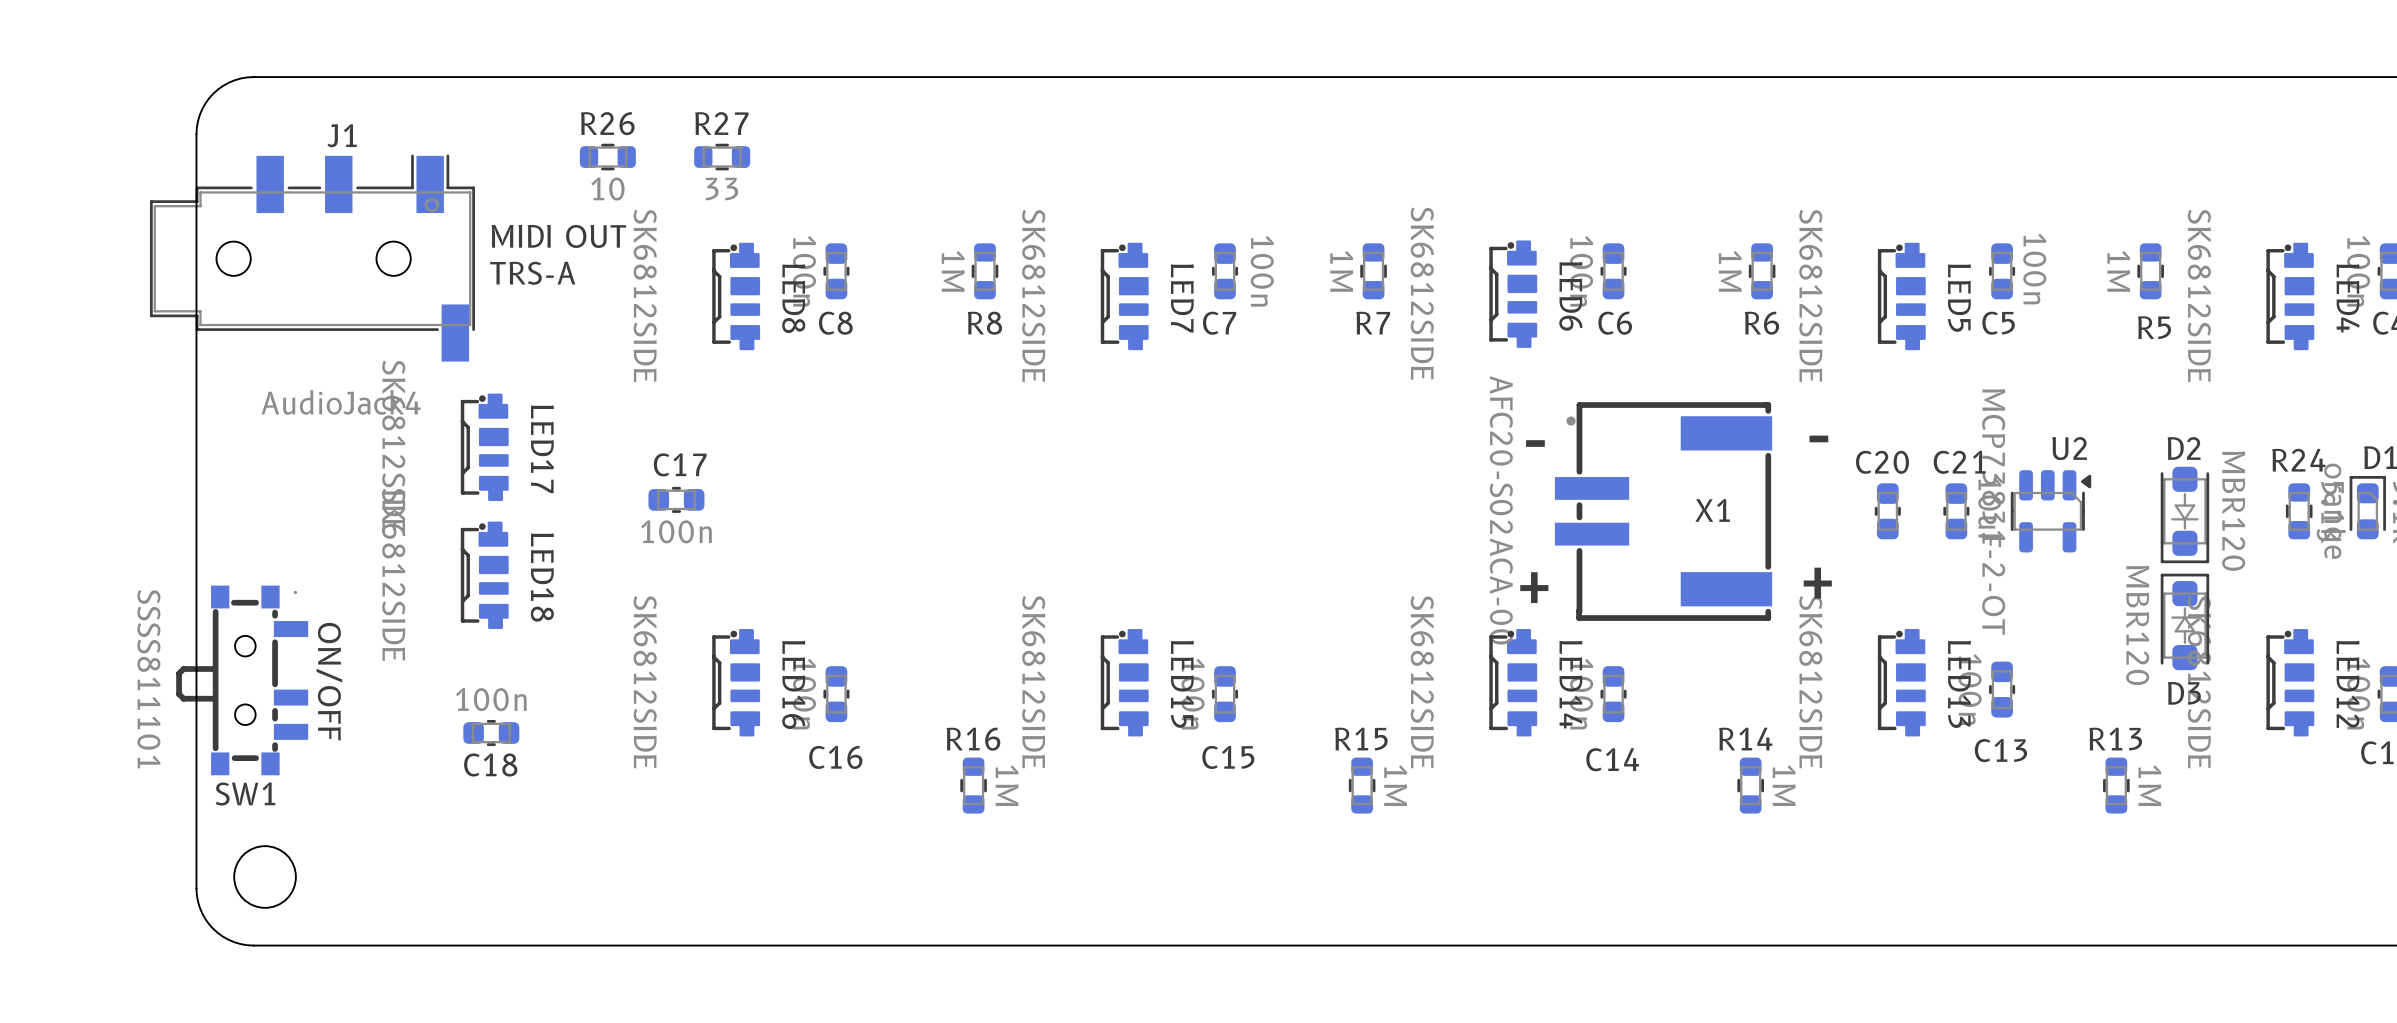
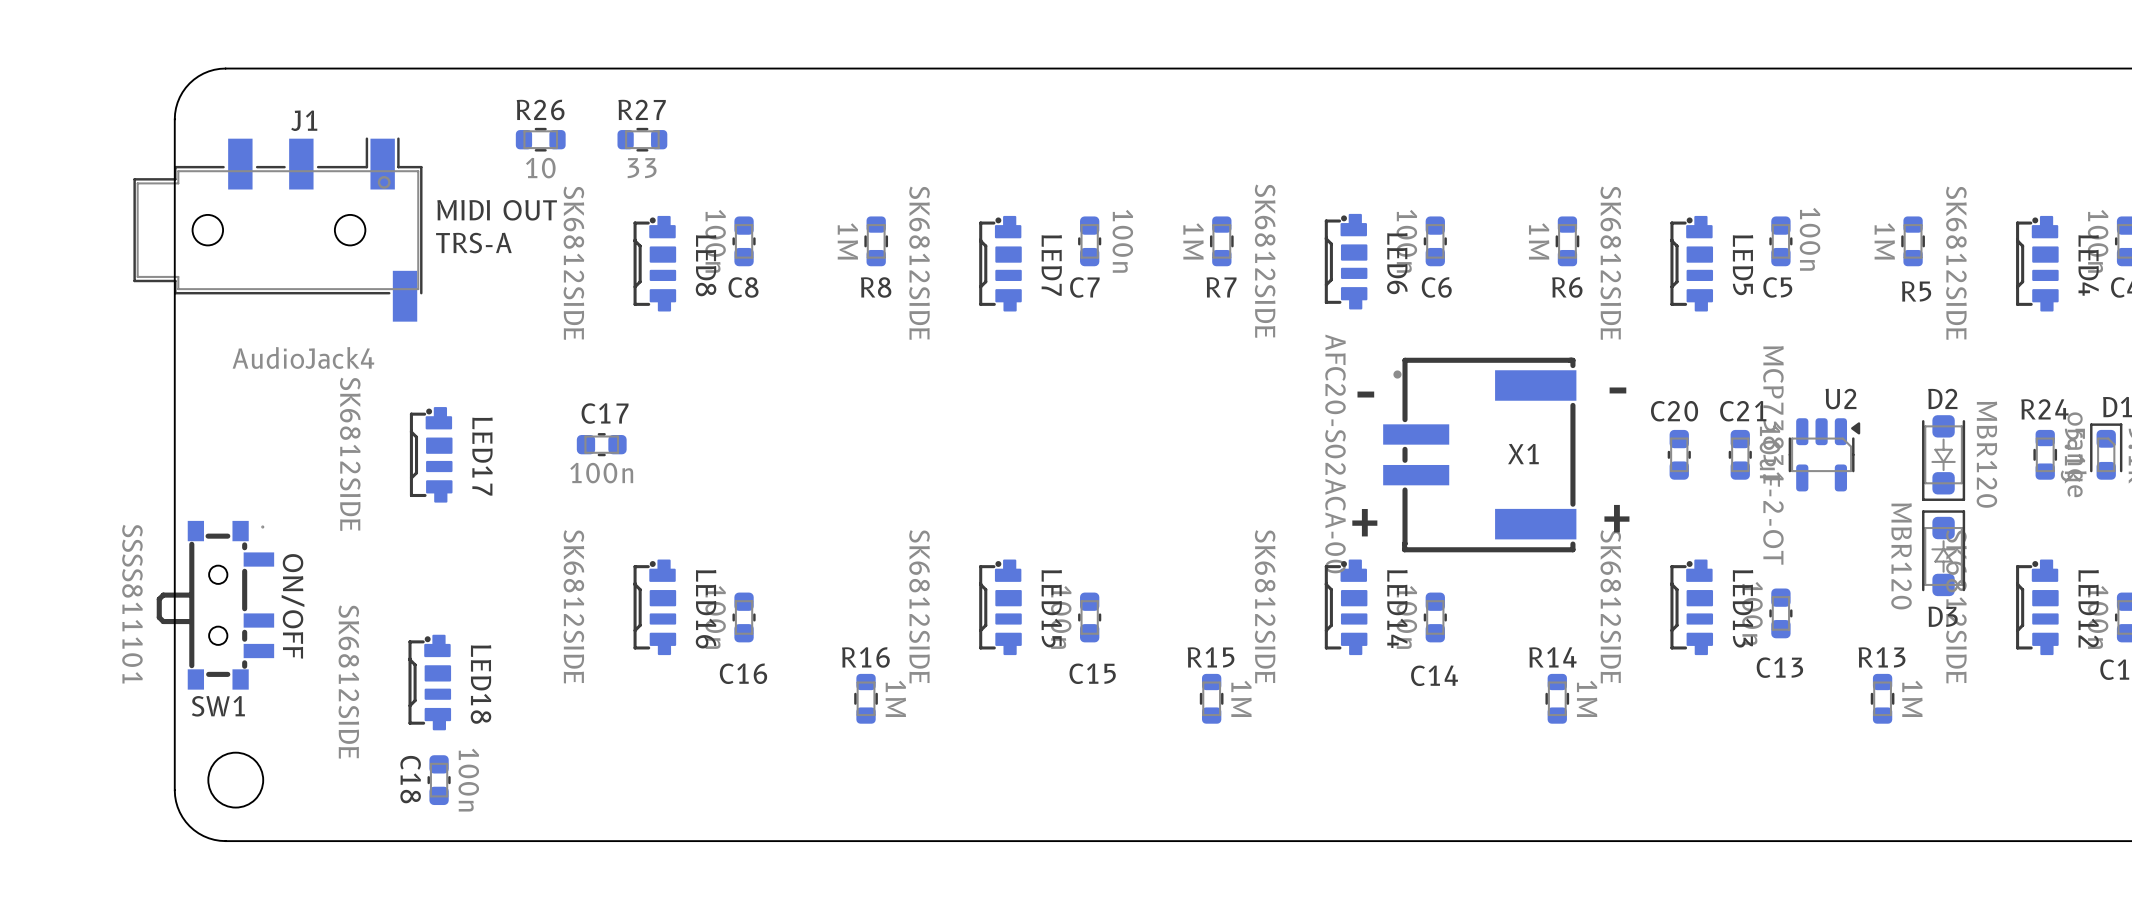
LED17 position: (484, 447) -> (431, 454)
LED18 position: (484, 575) -> (429, 682)
C18 rotation: 0° (491, 733) -> 90° clockwise (439, 780)
C18 position: (491, 733) -> (439, 780)

